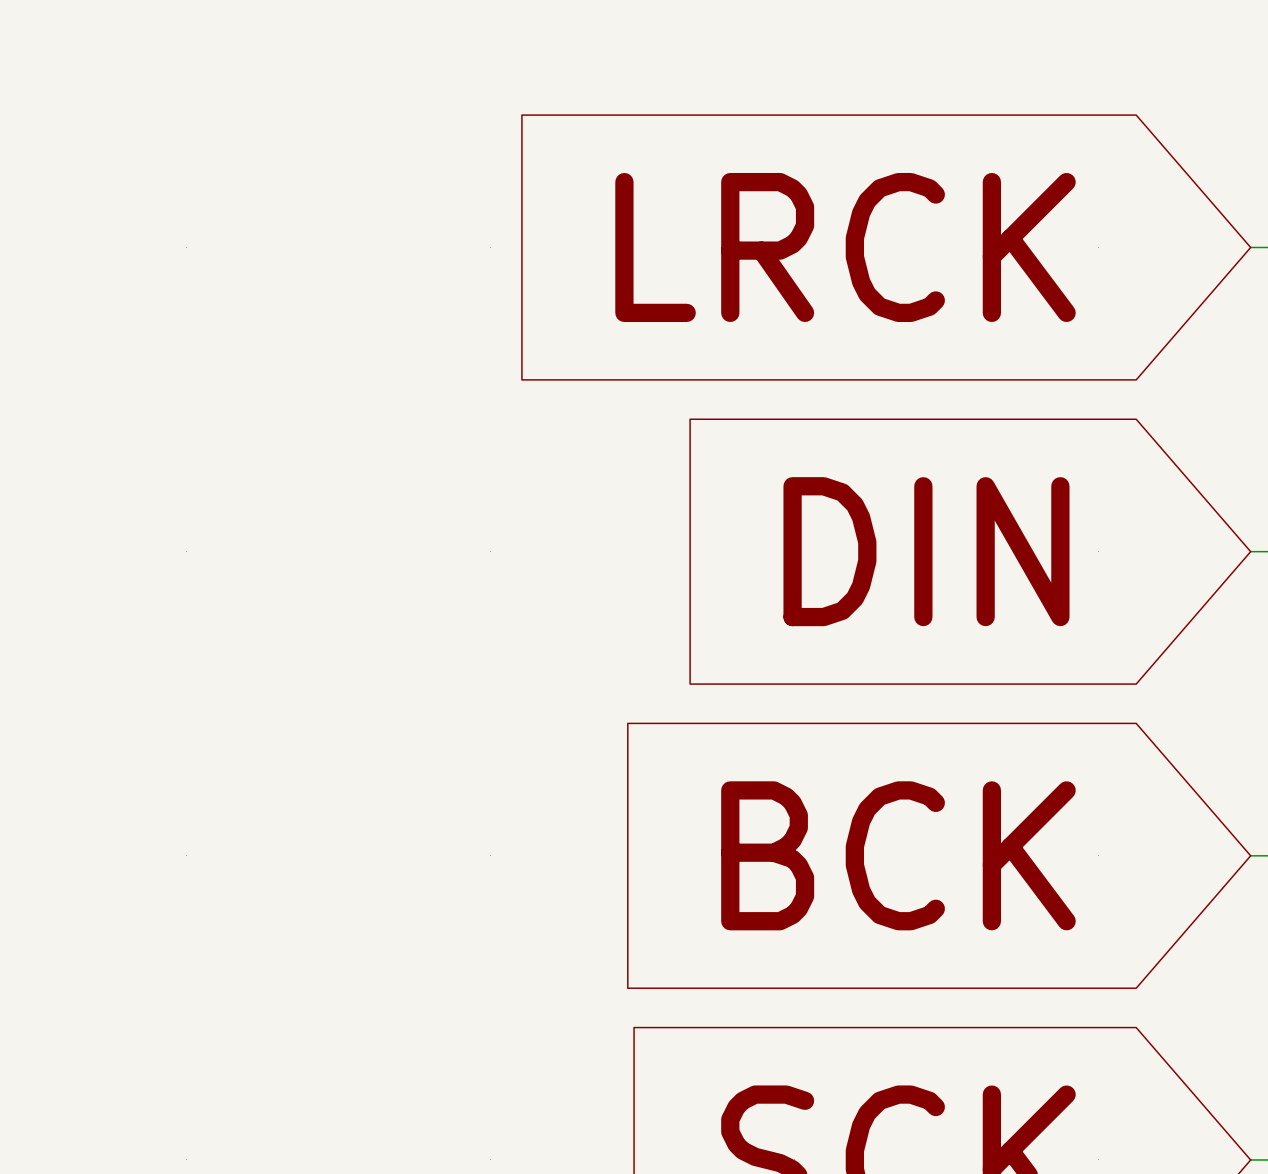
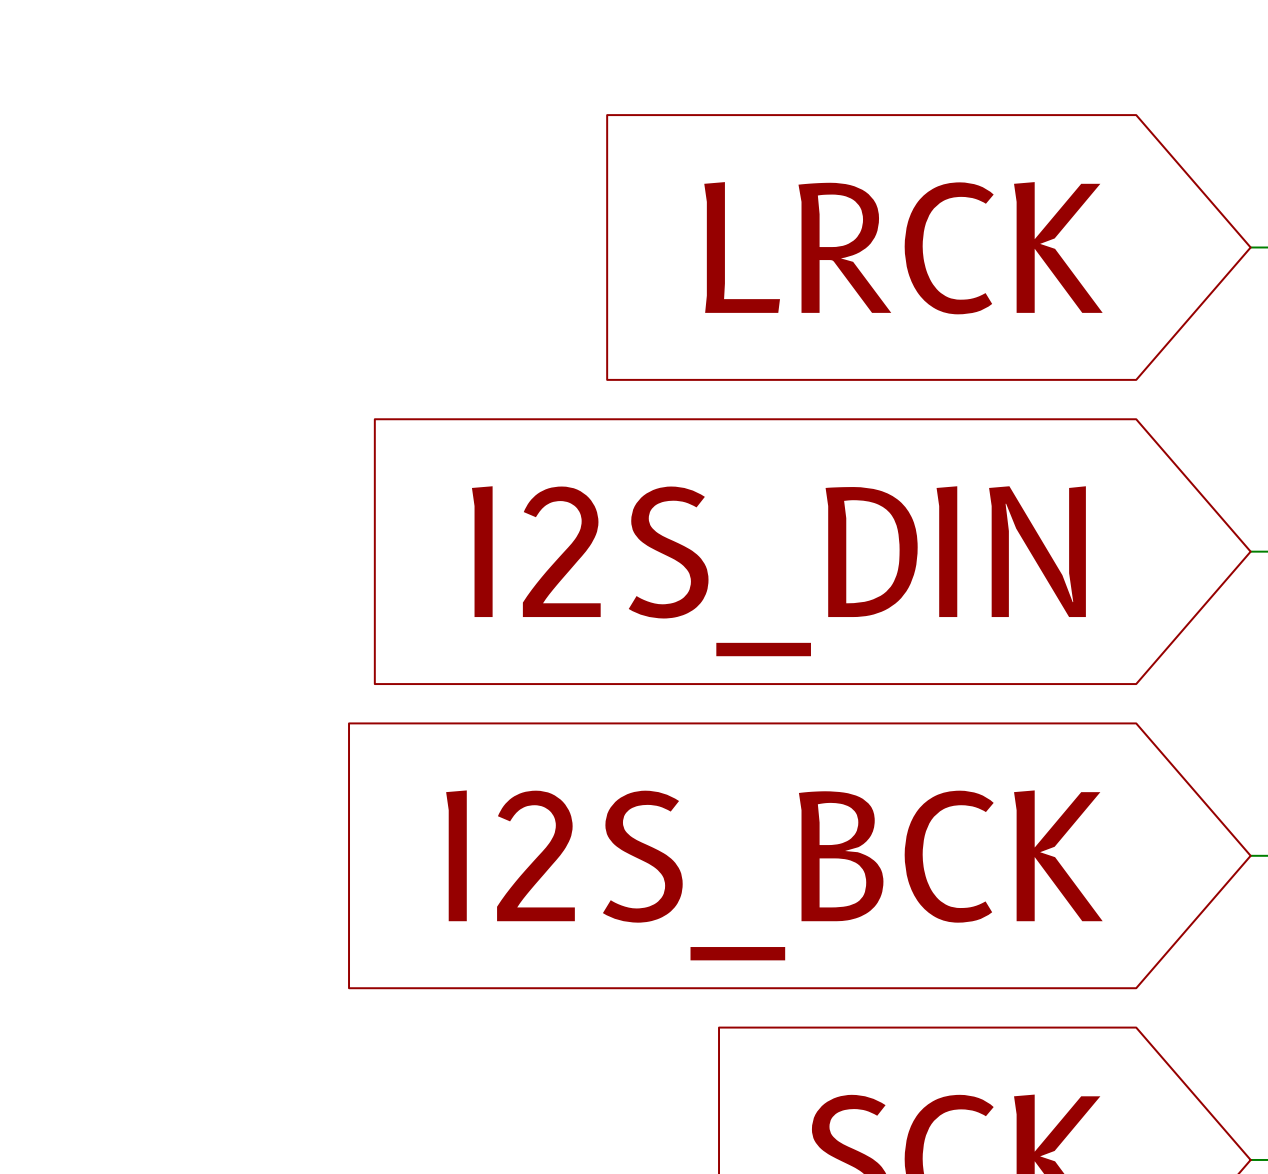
global label: DIN (926, 551) -> I2S_DIN (778, 571)
global label: BCK (898, 855) -> I2S_BCK (774, 875)

